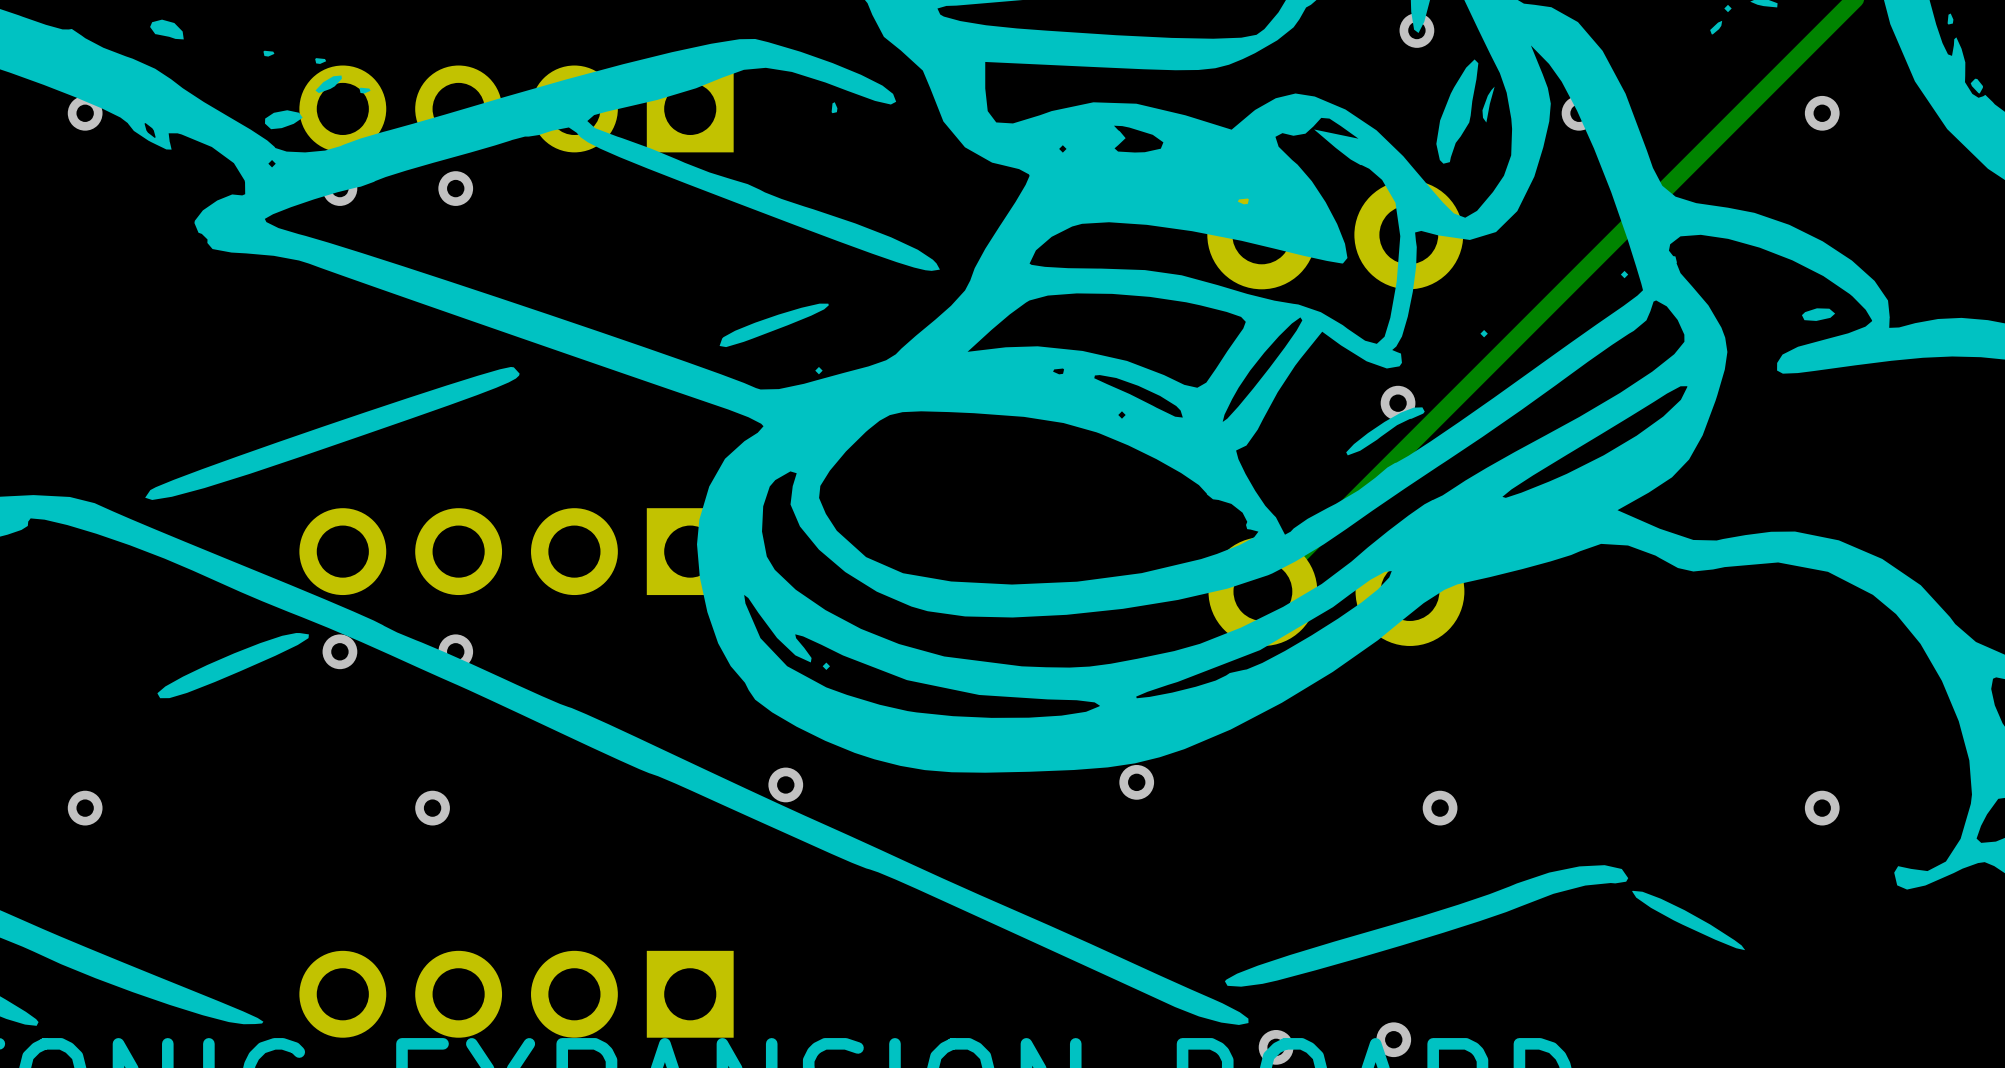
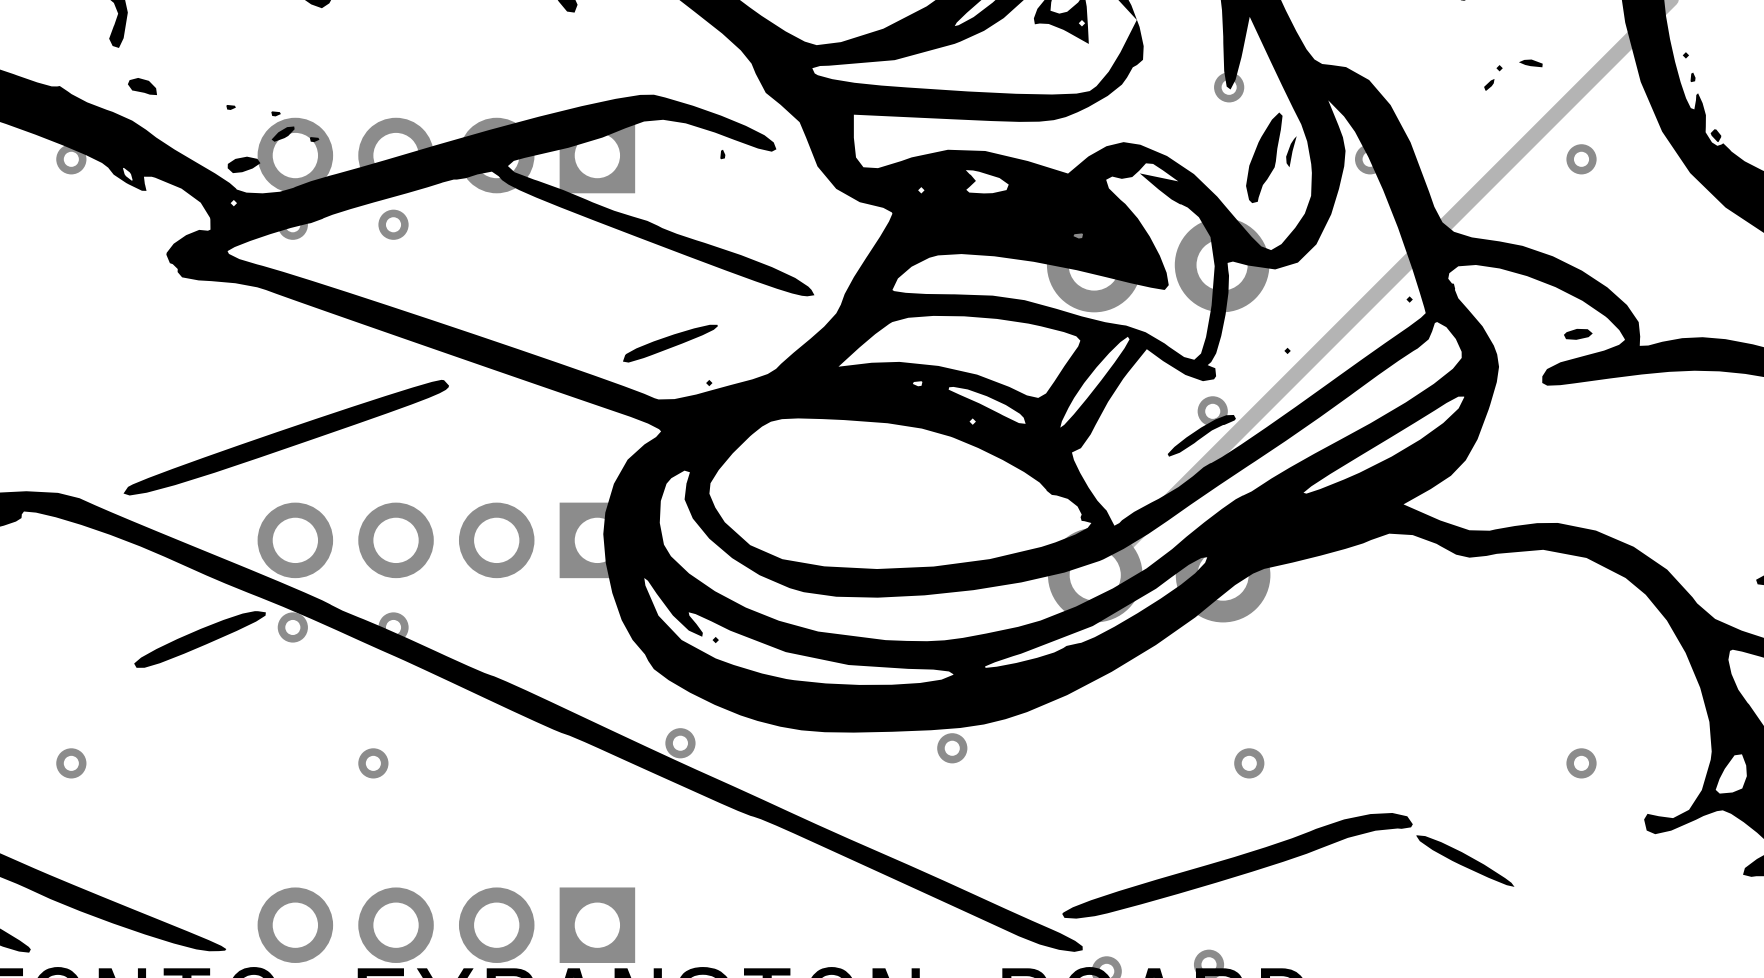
via position: (1136, 782) -> (952, 748)

